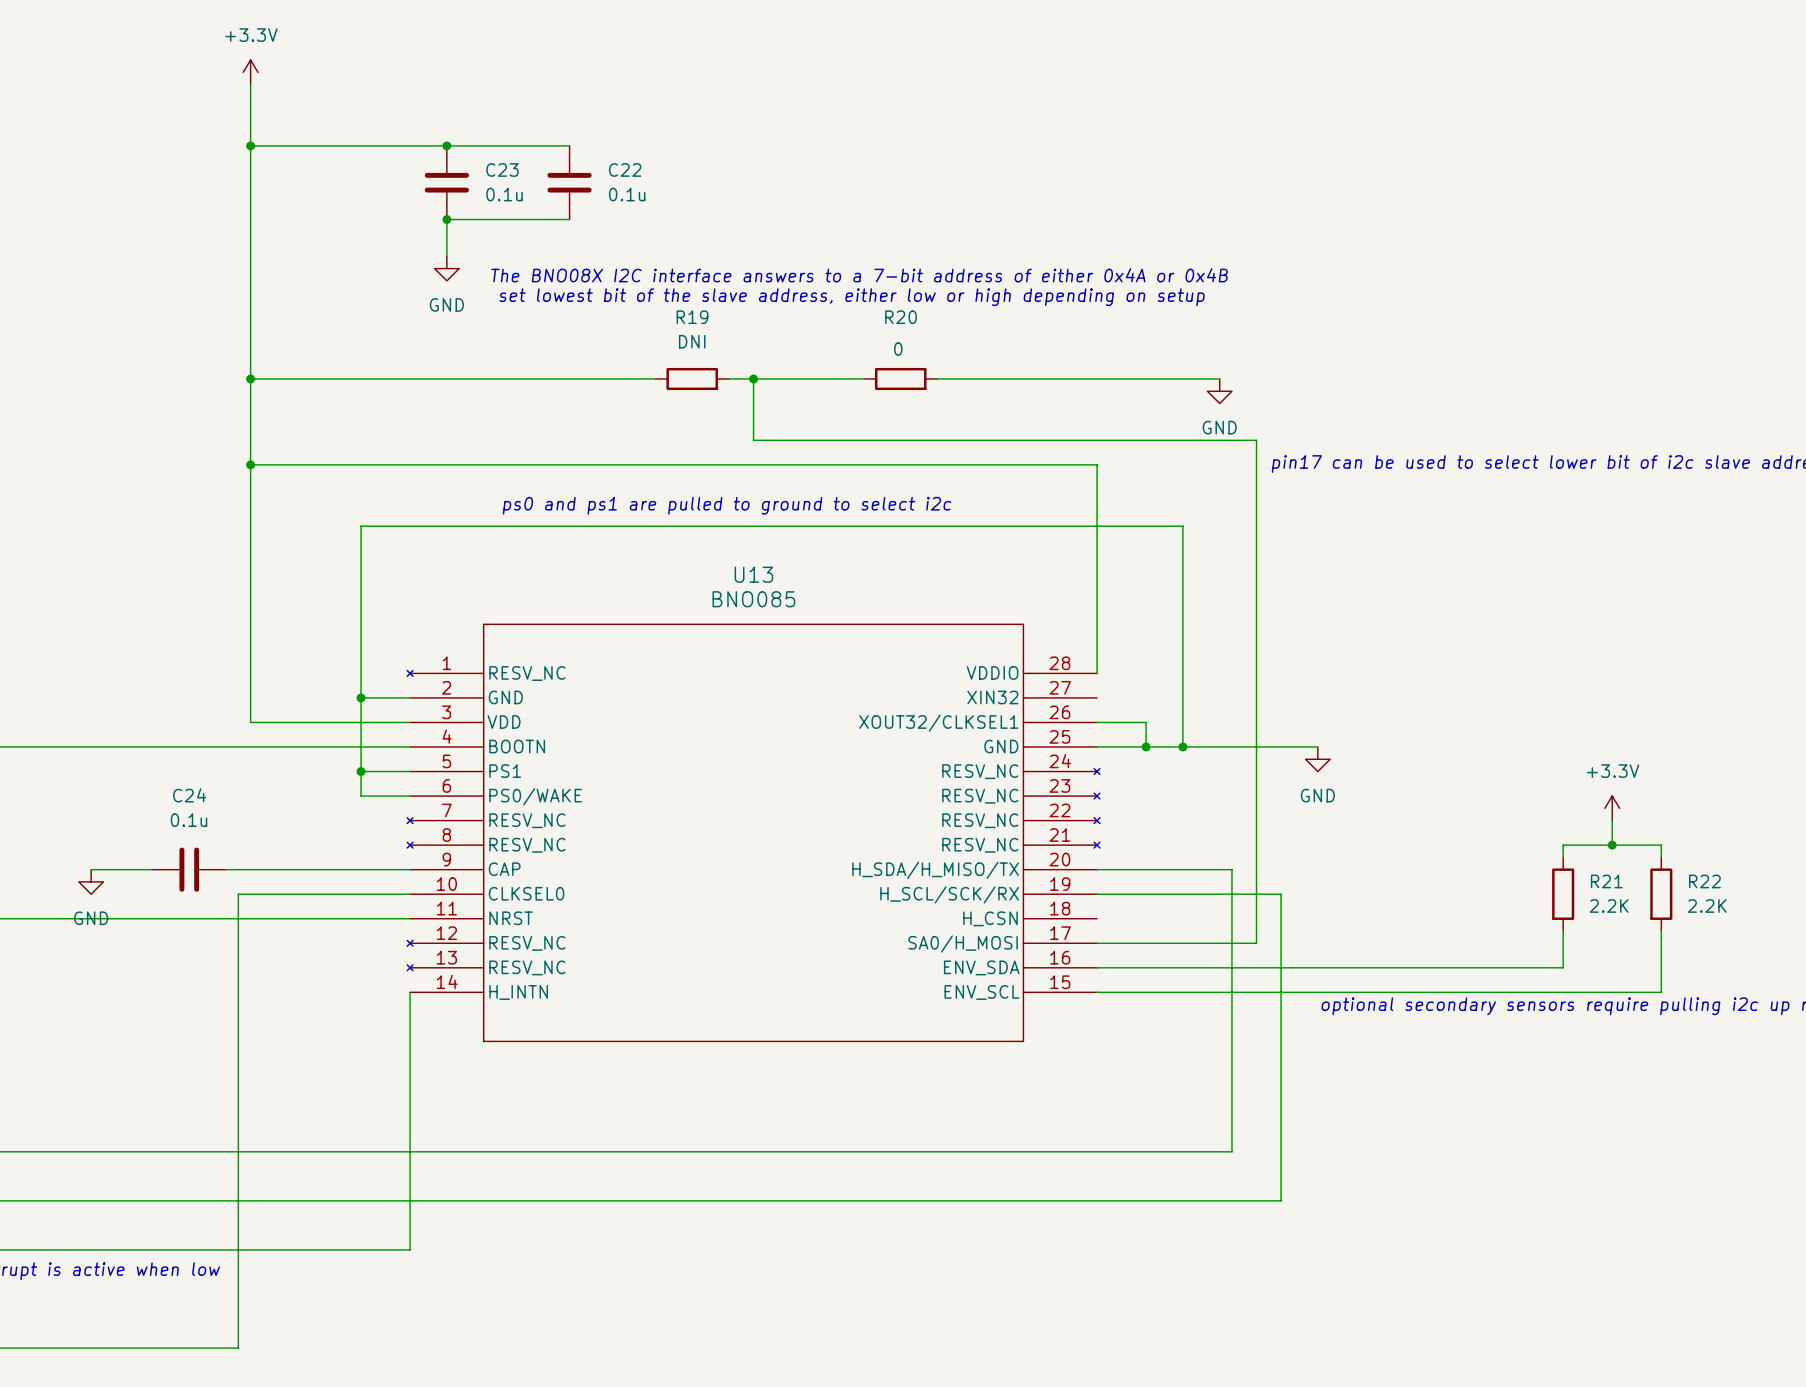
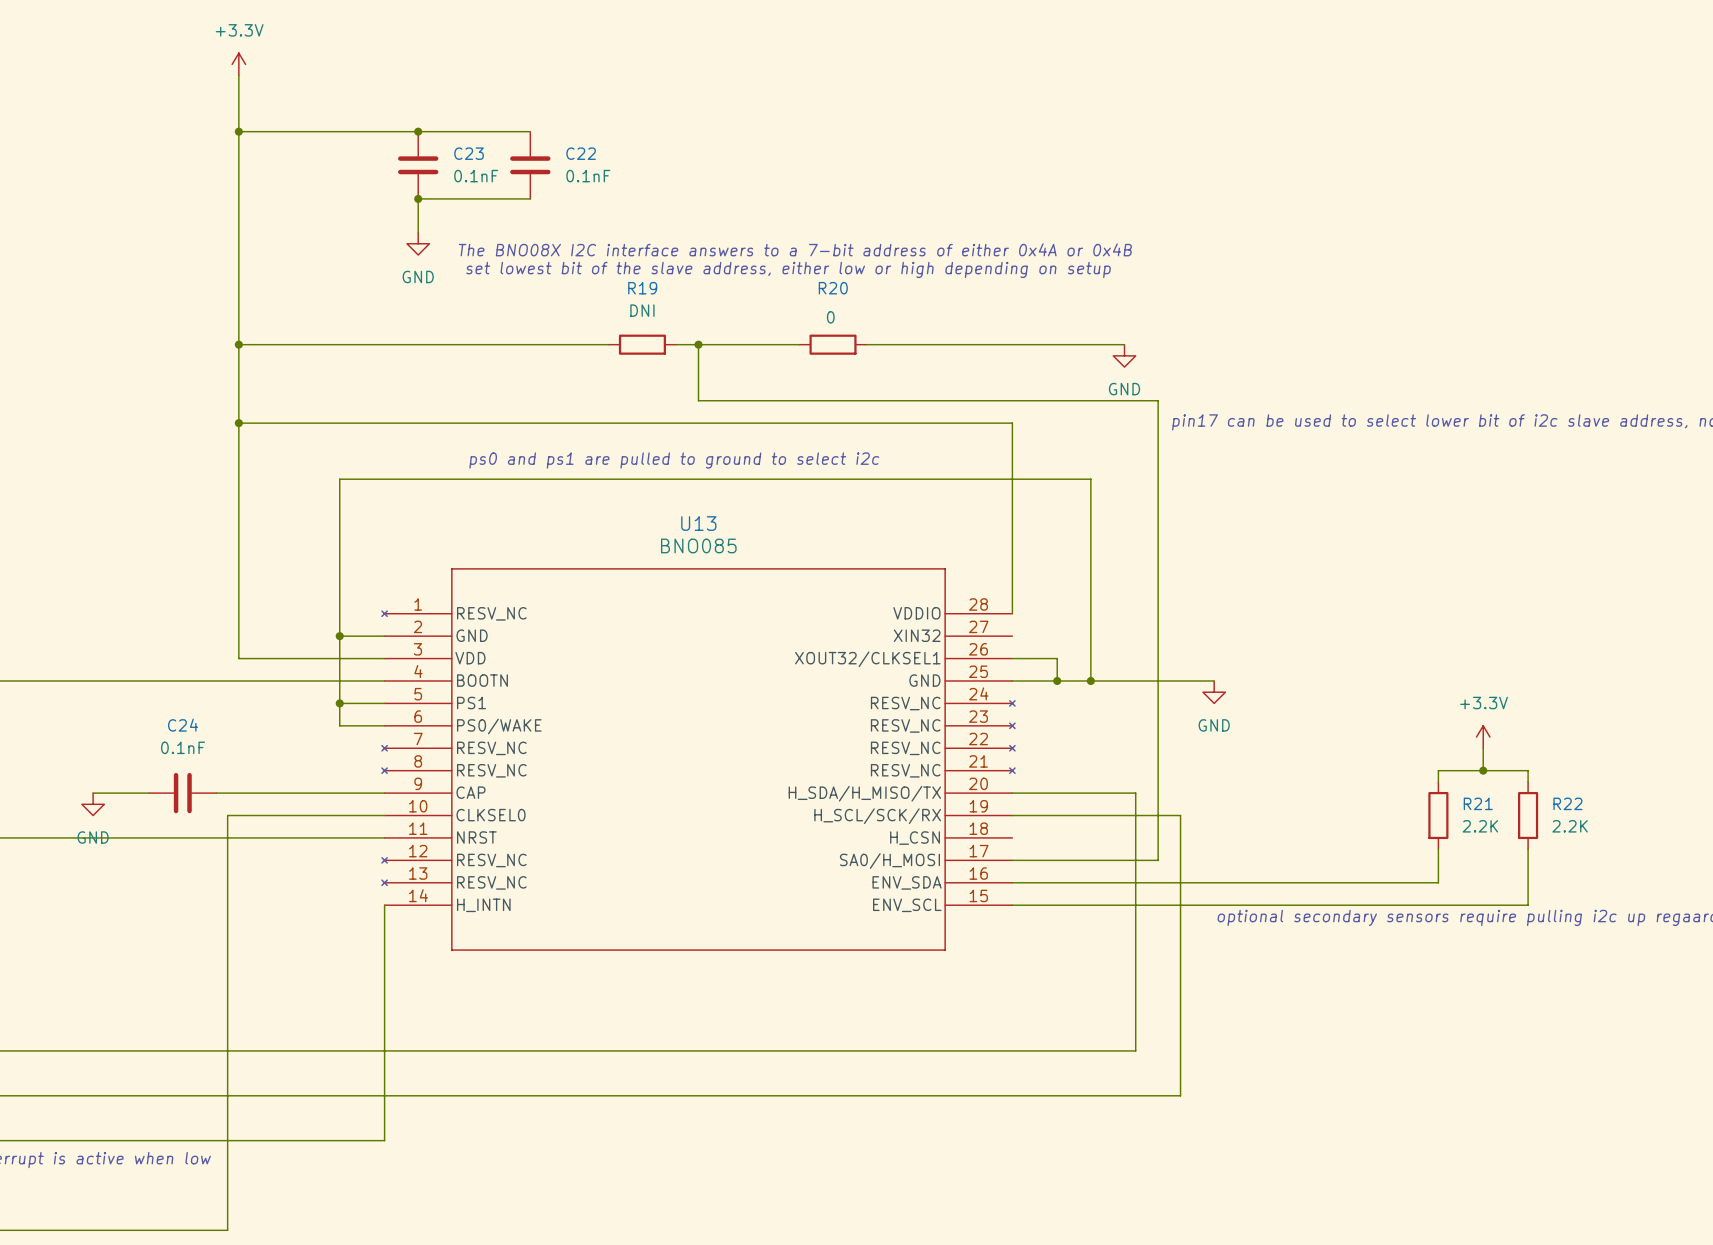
C23 value: 0.1u (504, 194) -> 0.1nF (476, 176)
C22 value: 0.1u (627, 194) -> 0.1nF (588, 176)
C24 value: 0.1u (188, 820) -> 0.1nF (183, 747)

